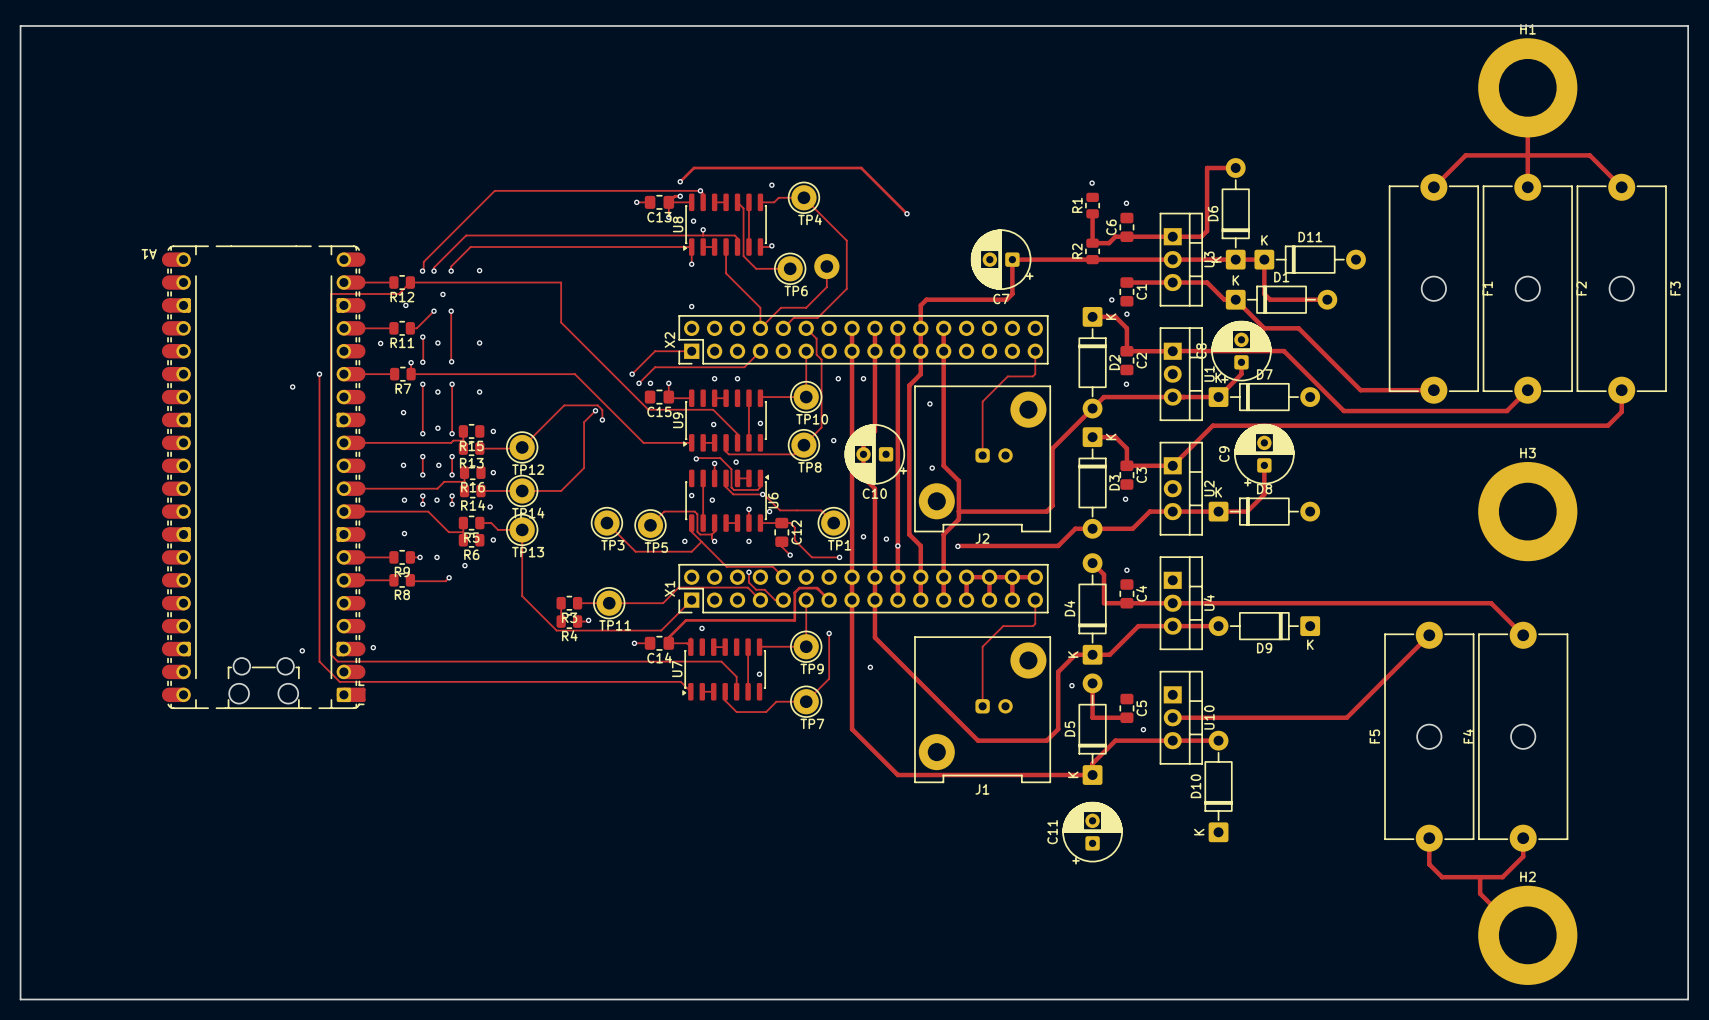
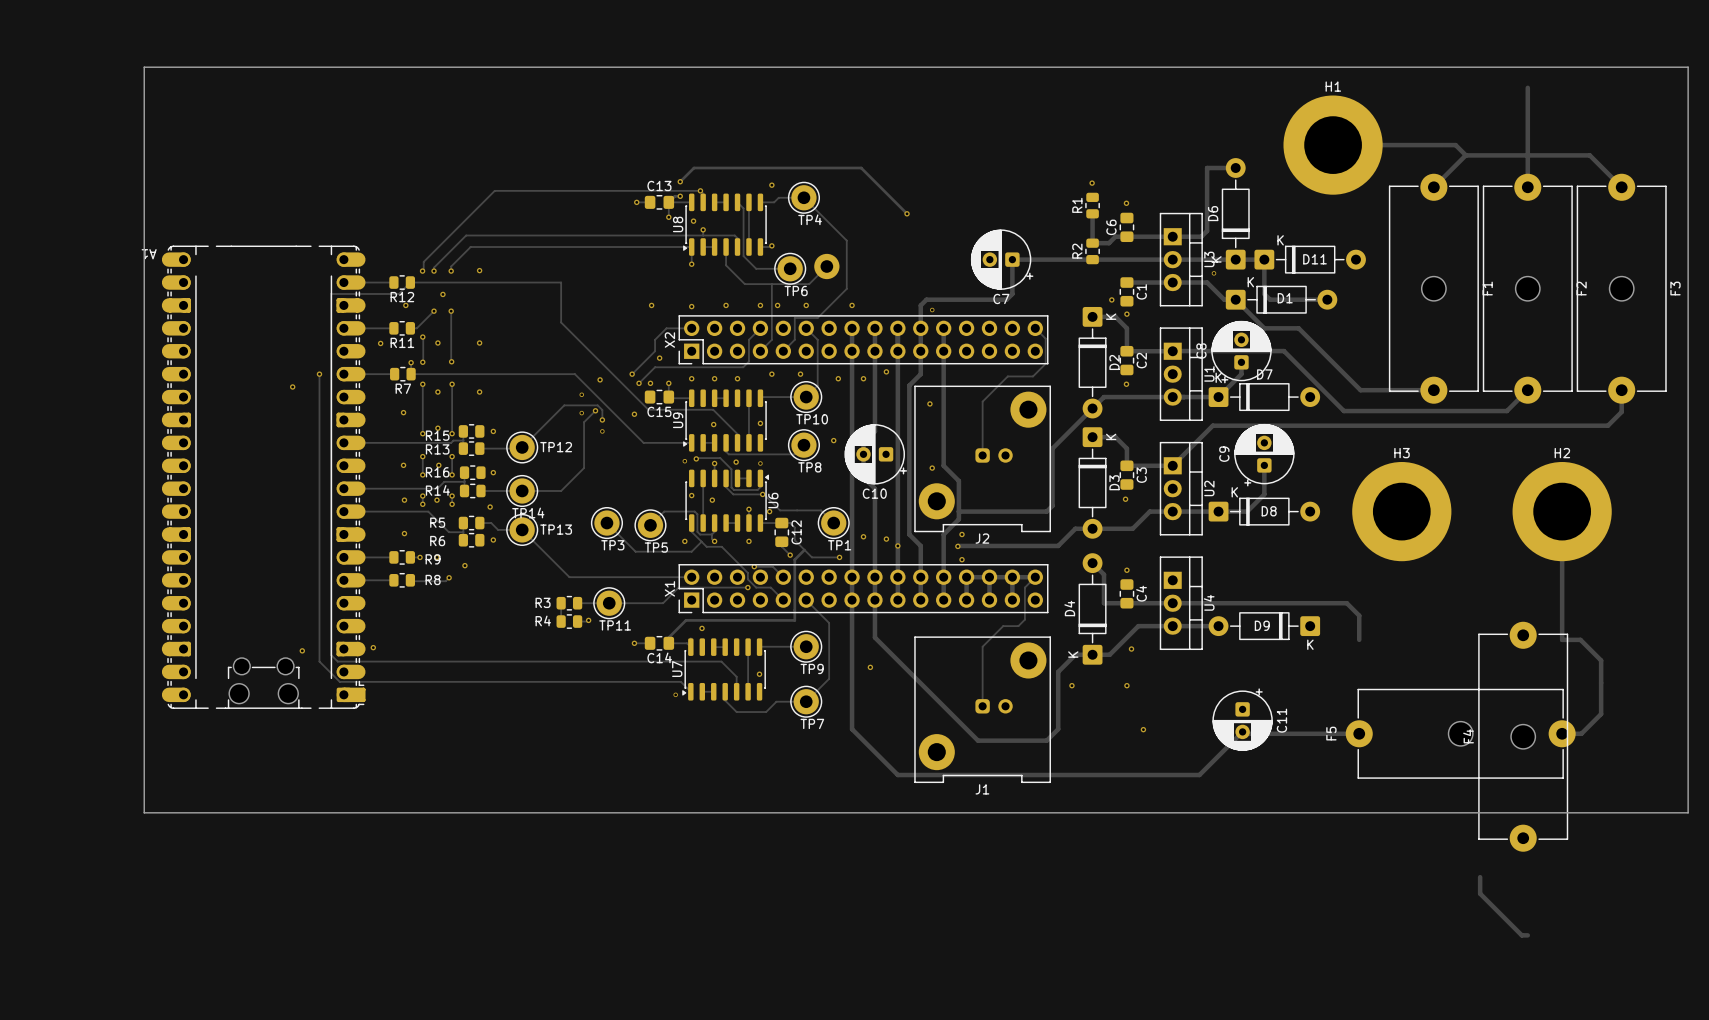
board edge: (1688, 67) (1688, 25) (20, 25) (20, 999) (1688, 999) (1688, 812) -> (1688, 67) (144, 67) (144, 812) (1688, 812)
H1 position: (1527, 87) -> (1333, 145)
track: none -> (1333, 145) (1455, 145) (1465, 155)
C13 name position: C13 (659, 217) -> C13 (659, 185)
D11 name position: D11 (1310, 237) -> D11 (1314, 259)
D11 text position: K (1264, 240) -> K (1280, 240)
track: (726, 265) (726, 273) (760, 307) (760, 328) (781, 307) (806, 307) (826, 287) (826, 266) -> (726, 265) (744, 284) (809, 284) (826, 266)
via: none -> (1213, 273)
D1 name position: D1 (1281, 277) -> D1 (1285, 298)
D1 text position: K (1235, 280) -> K (1250, 282)
track: none -> (771, 284) (771, 339) (760, 351)
via: none -> (651, 305)
via: none -> (726, 305)
via: none -> (760, 305)
via: none -> (777, 305)
via: none -> (806, 305)
via: none -> (852, 305)
via: none -> (932, 310)
track: (794, 317) (783, 328) -> (794, 317) (794, 339) (783, 351)
track: (816, 338) (816, 354) (821, 359) (821, 427) (803, 445) -> none
track: (655, 351) (691, 351) -> (655, 351) (655, 339) (666, 328) (691, 328)
track: (760, 351) (743, 367) -> (760, 328) (748, 339) (748, 361) (743, 367)
track: (806, 351) (806, 397) -> (816, 338) (817, 385) (806, 397)
track: (1035, 351) (1035, 374) -> (1035, 328) (1045, 338) (1045, 363) (1035, 374)
via: none -> (659, 358)
via: none -> (886, 371)
via: none -> (771, 374)
via: none -> (800, 374)
via: none -> (691, 378)
via: none -> (600, 379)
via: none -> (581, 394)
via: none -> (581, 413)
via: none -> (634, 414)
via: none -> (602, 431)
R15 name position: R15 (471, 445) -> R15 (437, 435)
via: none -> (684, 461)
R13 name position: R13 (471, 463) -> R13 (437, 449)
via: none -> (760, 463)
TP12 name position: TP12 (528, 469) -> TP12 (556, 447)
R16 name position: R16 (472, 487) -> R16 (437, 472)
D8 name position: D8 (1264, 488) -> D8 (1269, 511)
D8 text position: K (1218, 492) -> K (1234, 492)
R14 name position: R14 (473, 505) -> R14 (437, 490)
H3 position: (1527, 511) -> (1401, 511)
track: none -> (1562, 511) (1562, 639) (1580, 639) (1601, 660) (1601, 714) (1581, 733) (1562, 733) (1563, 738)
track: (522, 529) (522, 596) (556, 630) (661, 630) (691, 600) -> (522, 529) (569, 577) (691, 577)
via: none -> (962, 534)
R5 name position: R5 (471, 537) -> R5 (437, 522)
track: (706, 546) (726, 566) (754, 566) -> (706, 546) (721, 546) (747, 572) (747, 579) (756, 587) (770, 587) (783, 600)
TP13 name position: TP13 (528, 552) -> TP13 (556, 529)
R6 name position: R6 (471, 554) -> R6 (437, 541)
via: none -> (962, 559)
via: none -> (754, 566)
R9 name position: R9 (402, 571) -> R9 (433, 559)
track: (748, 572) (748, 582) (756, 589) (764, 589) (775, 600) (783, 600) -> none
via: (748, 572) -> none
track: (747, 587) (760, 600) -> none
via: none -> (747, 587)
track: (794, 592) (799, 588) (817, 588) (829, 600) -> (794, 592) (794, 559) (804, 549)
R8 name position: R8 (402, 594) -> R8 (433, 579)
track: (806, 600) (806, 646) -> (806, 600) (829, 623) (829, 633)
track: (1035, 600) (1035, 623) (1033, 626) (1018, 626) -> (1035, 577) (1024, 587) (1024, 619) (1018, 626)
track: (1346, 603) (1491, 603) (1523, 635) -> (1346, 603) (1359, 615) (1359, 639)
R3 name position: R3 (569, 617) -> R3 (543, 602)
via: (829, 633) -> none
R4 name position: R4 (569, 635) -> R4 (543, 620)
track: (1429, 635) (1346, 717) (1172, 717) -> none
D9 name position: D9 (1264, 648) -> D9 (1262, 625)
via: none -> (1131, 649)
track: (1092, 683) (1092, 717) (1126, 717) -> none
via: none -> (1126, 685)
via: none -> (675, 694)
C5: (1126, 708) -> none
U10: (1181, 717) -> none
D5: (1092, 729) -> none
F5 name position: F5 (1374, 736) -> F5 (1331, 733)
F5 rotation: 0° (1429, 736) -> 90° clockwise (1460, 733)
track: (1218, 740) (1115, 740) (1092, 763) (1092, 775) -> (1359, 733) (1244, 733) (1242, 731) (1199, 775) (1092, 775)
D10: (1218, 786) -> none
C11 rotation: 0° (1092, 833) -> 180° (1242, 719)
C11 position: (1092, 833) -> (1242, 719)
track: (1429, 838) (1429, 864) (1442, 877) (1502, 877) (1523, 856) (1523, 838) -> none
H2 position: (1527, 935) -> (1562, 511)

